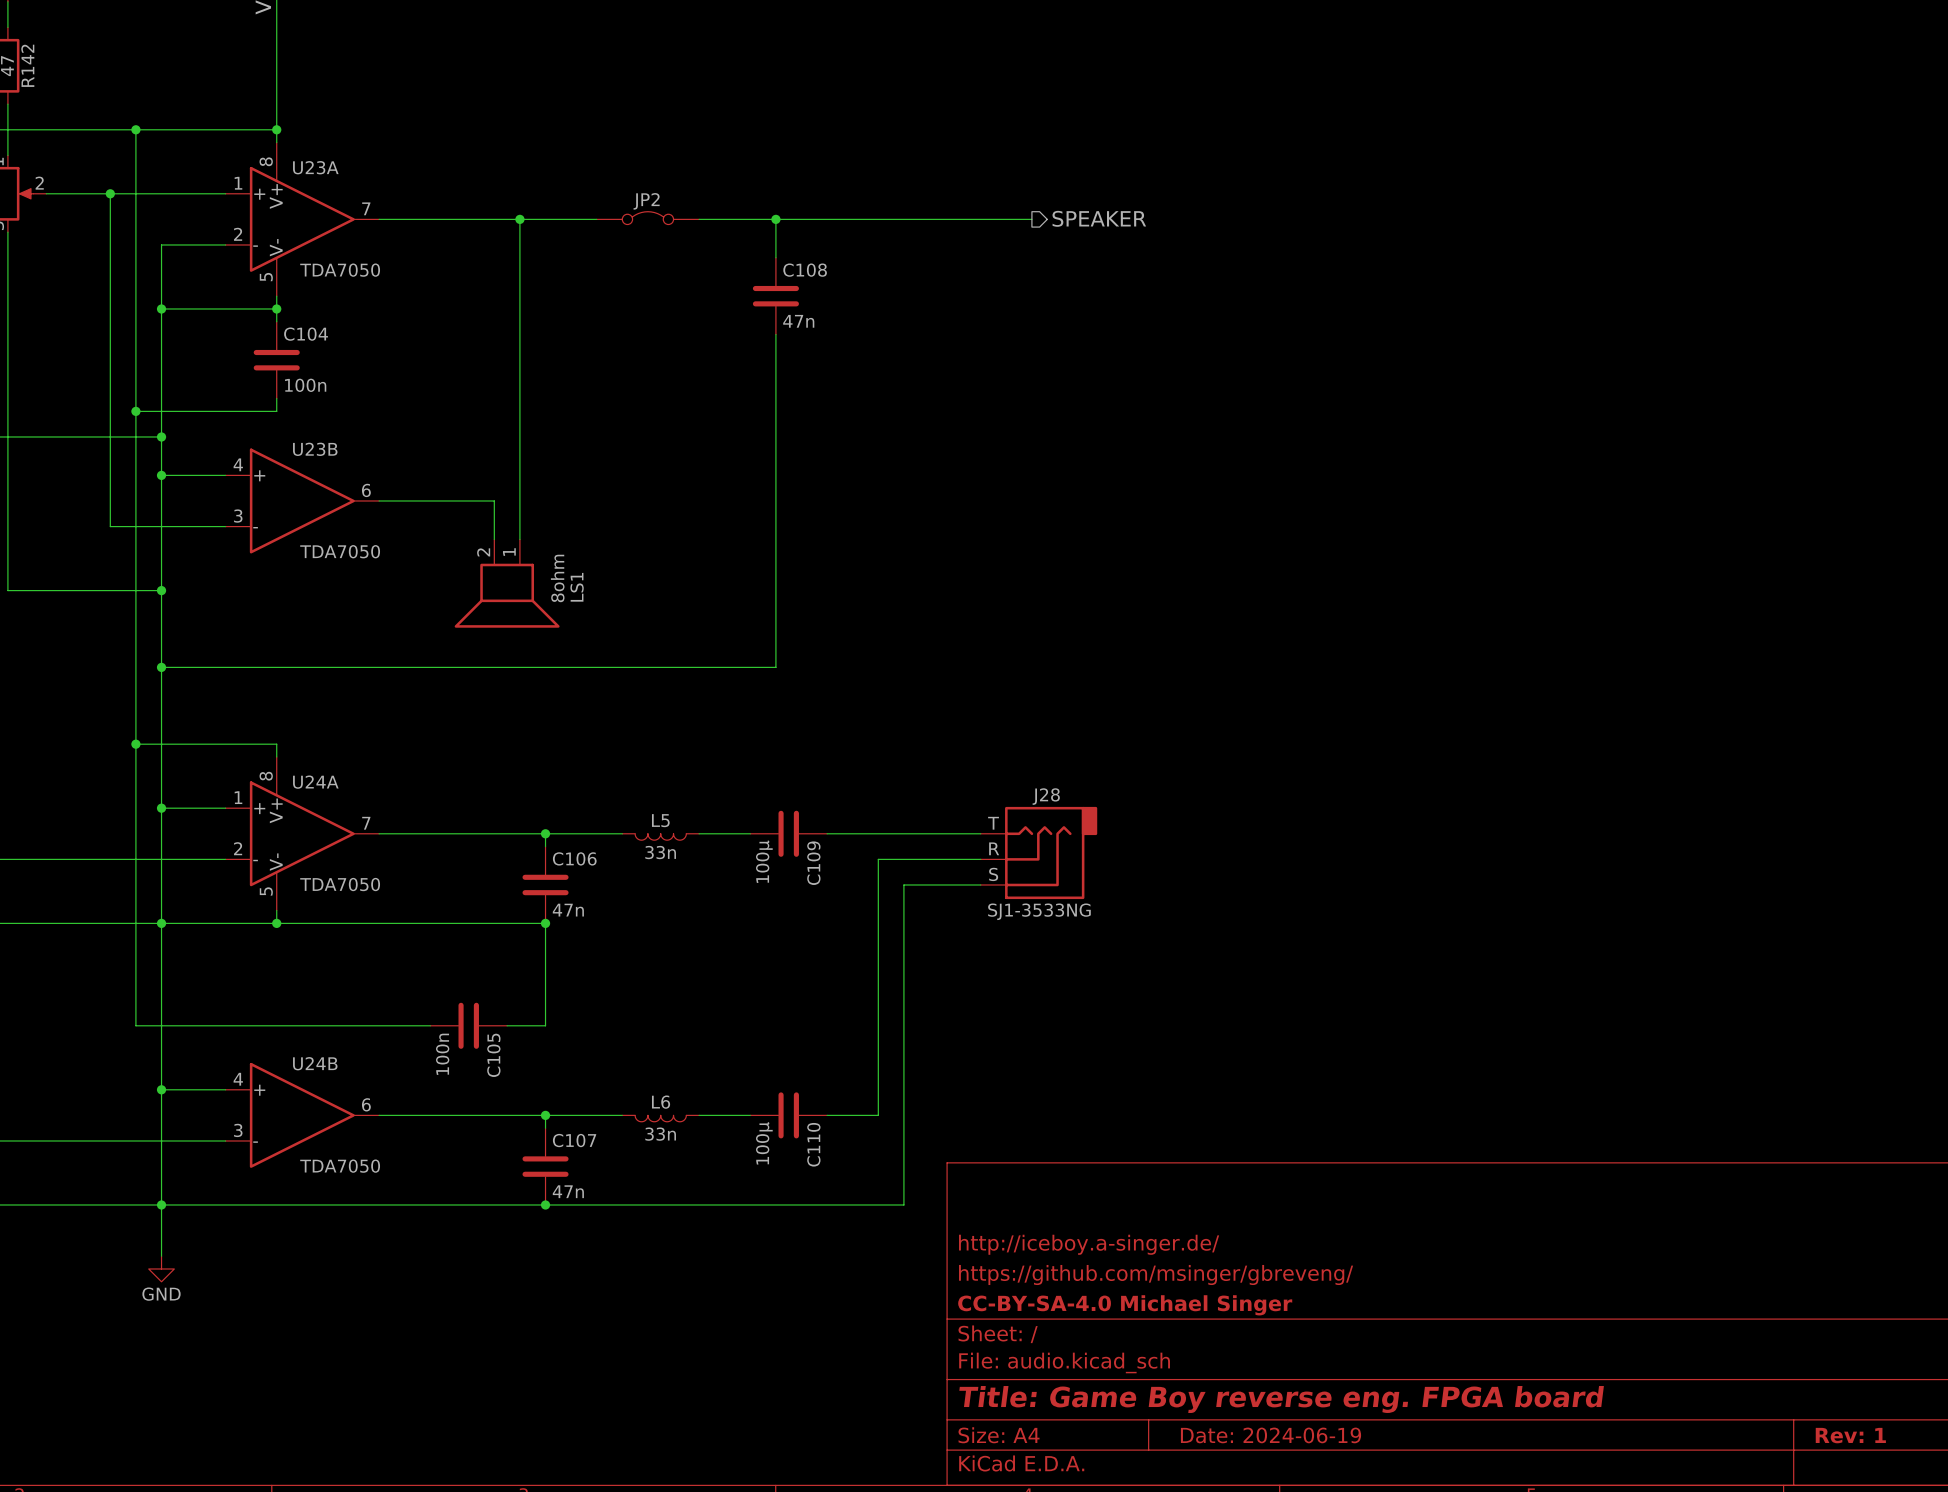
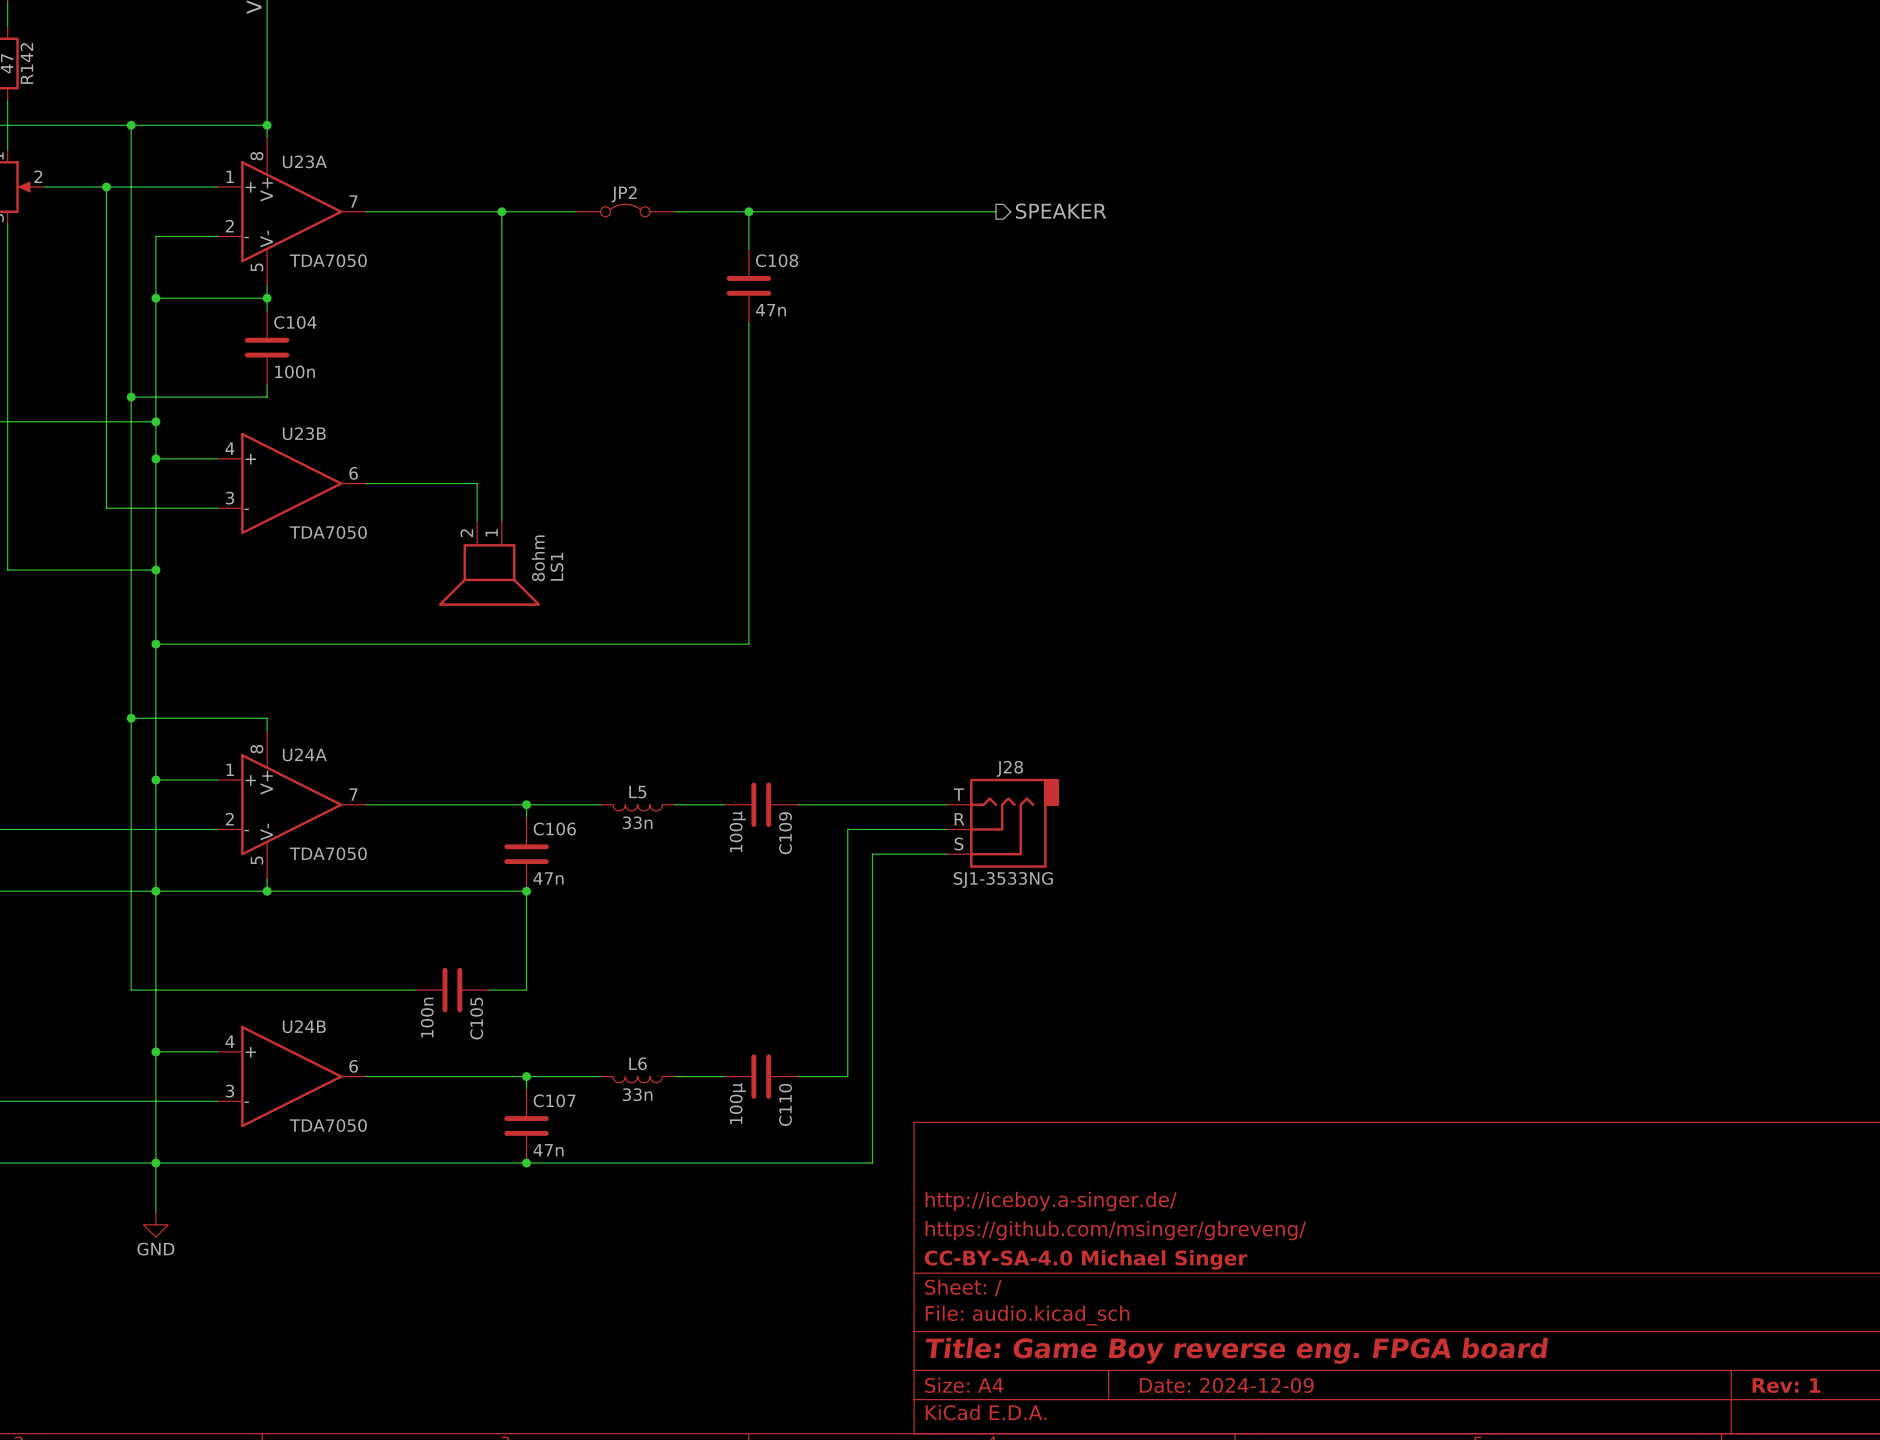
title block: Date: 2024-06-19 (1270, 1435) -> Date: 2024-12-09 (1226, 1385)

